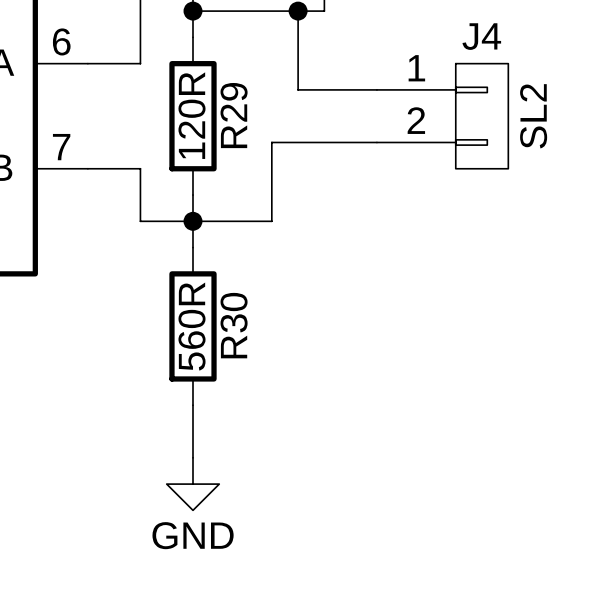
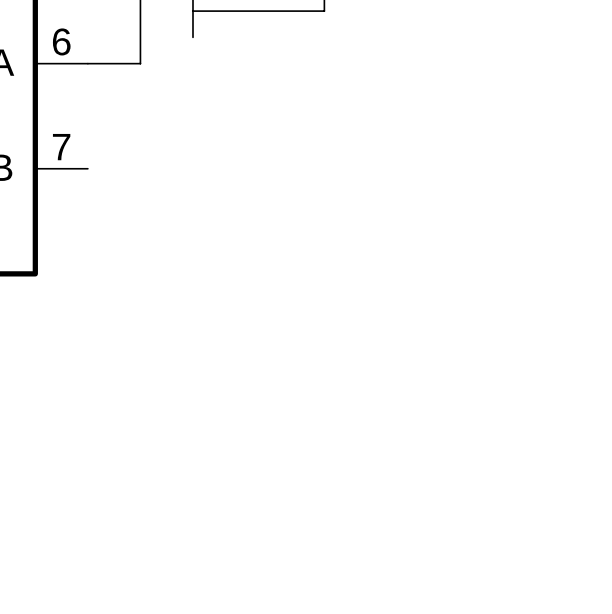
junction: (192, 11) -> none
wire: (298, 11) (298, 89) (376, 89) -> none
junction: (298, 11) -> none
R29: 120R (192, 116) -> none
J4: SL2 (442, 116) -> none
wire: (376, 142) (271, 142) (271, 221) (140, 221) (140, 168) (87, 168) -> none
wire: (192, 195) (192, 247) -> none
junction: (192, 221) -> none
R30: 560R (192, 326) -> none
wire: (192, 405) (192, 457) -> none
power symbol: GND (192, 484) -> none

